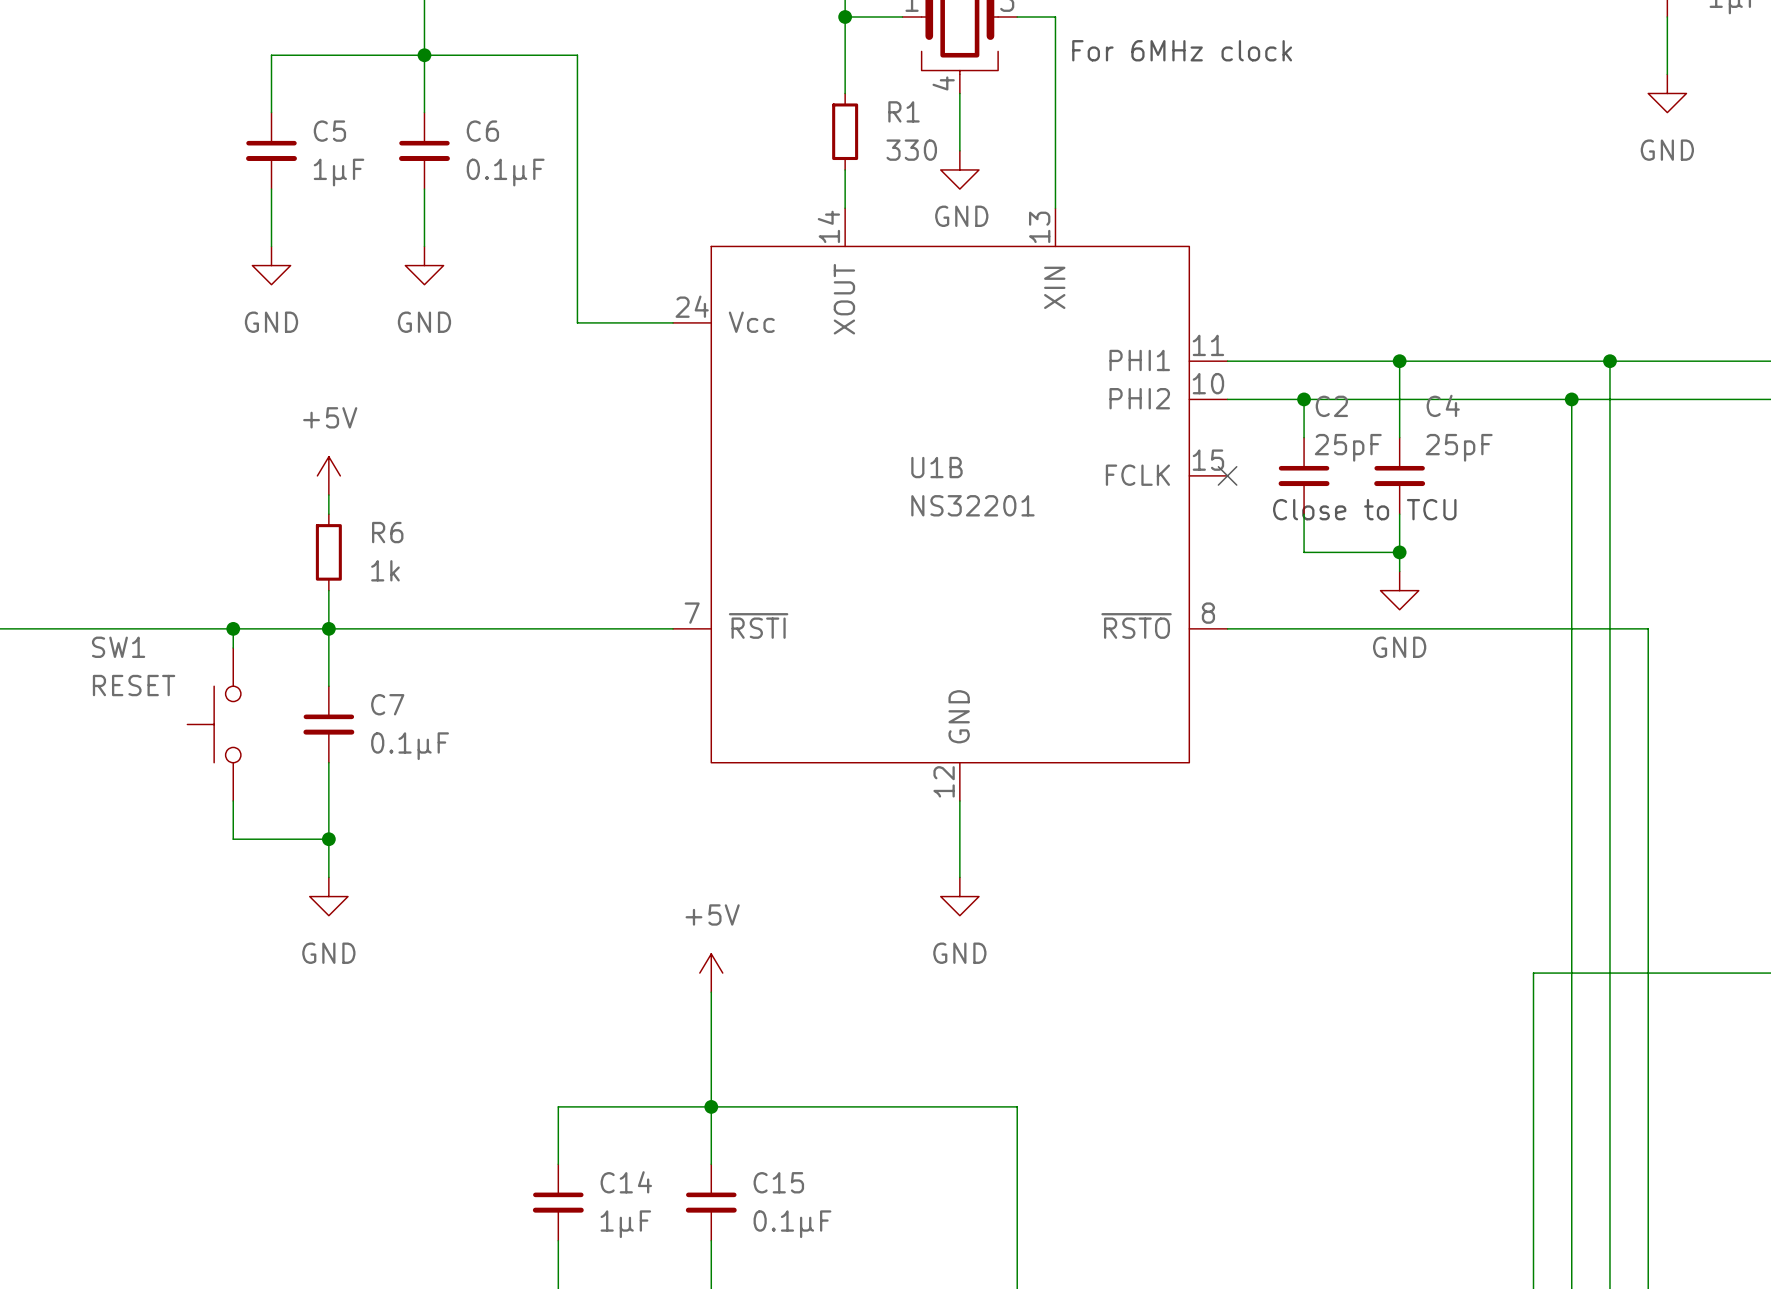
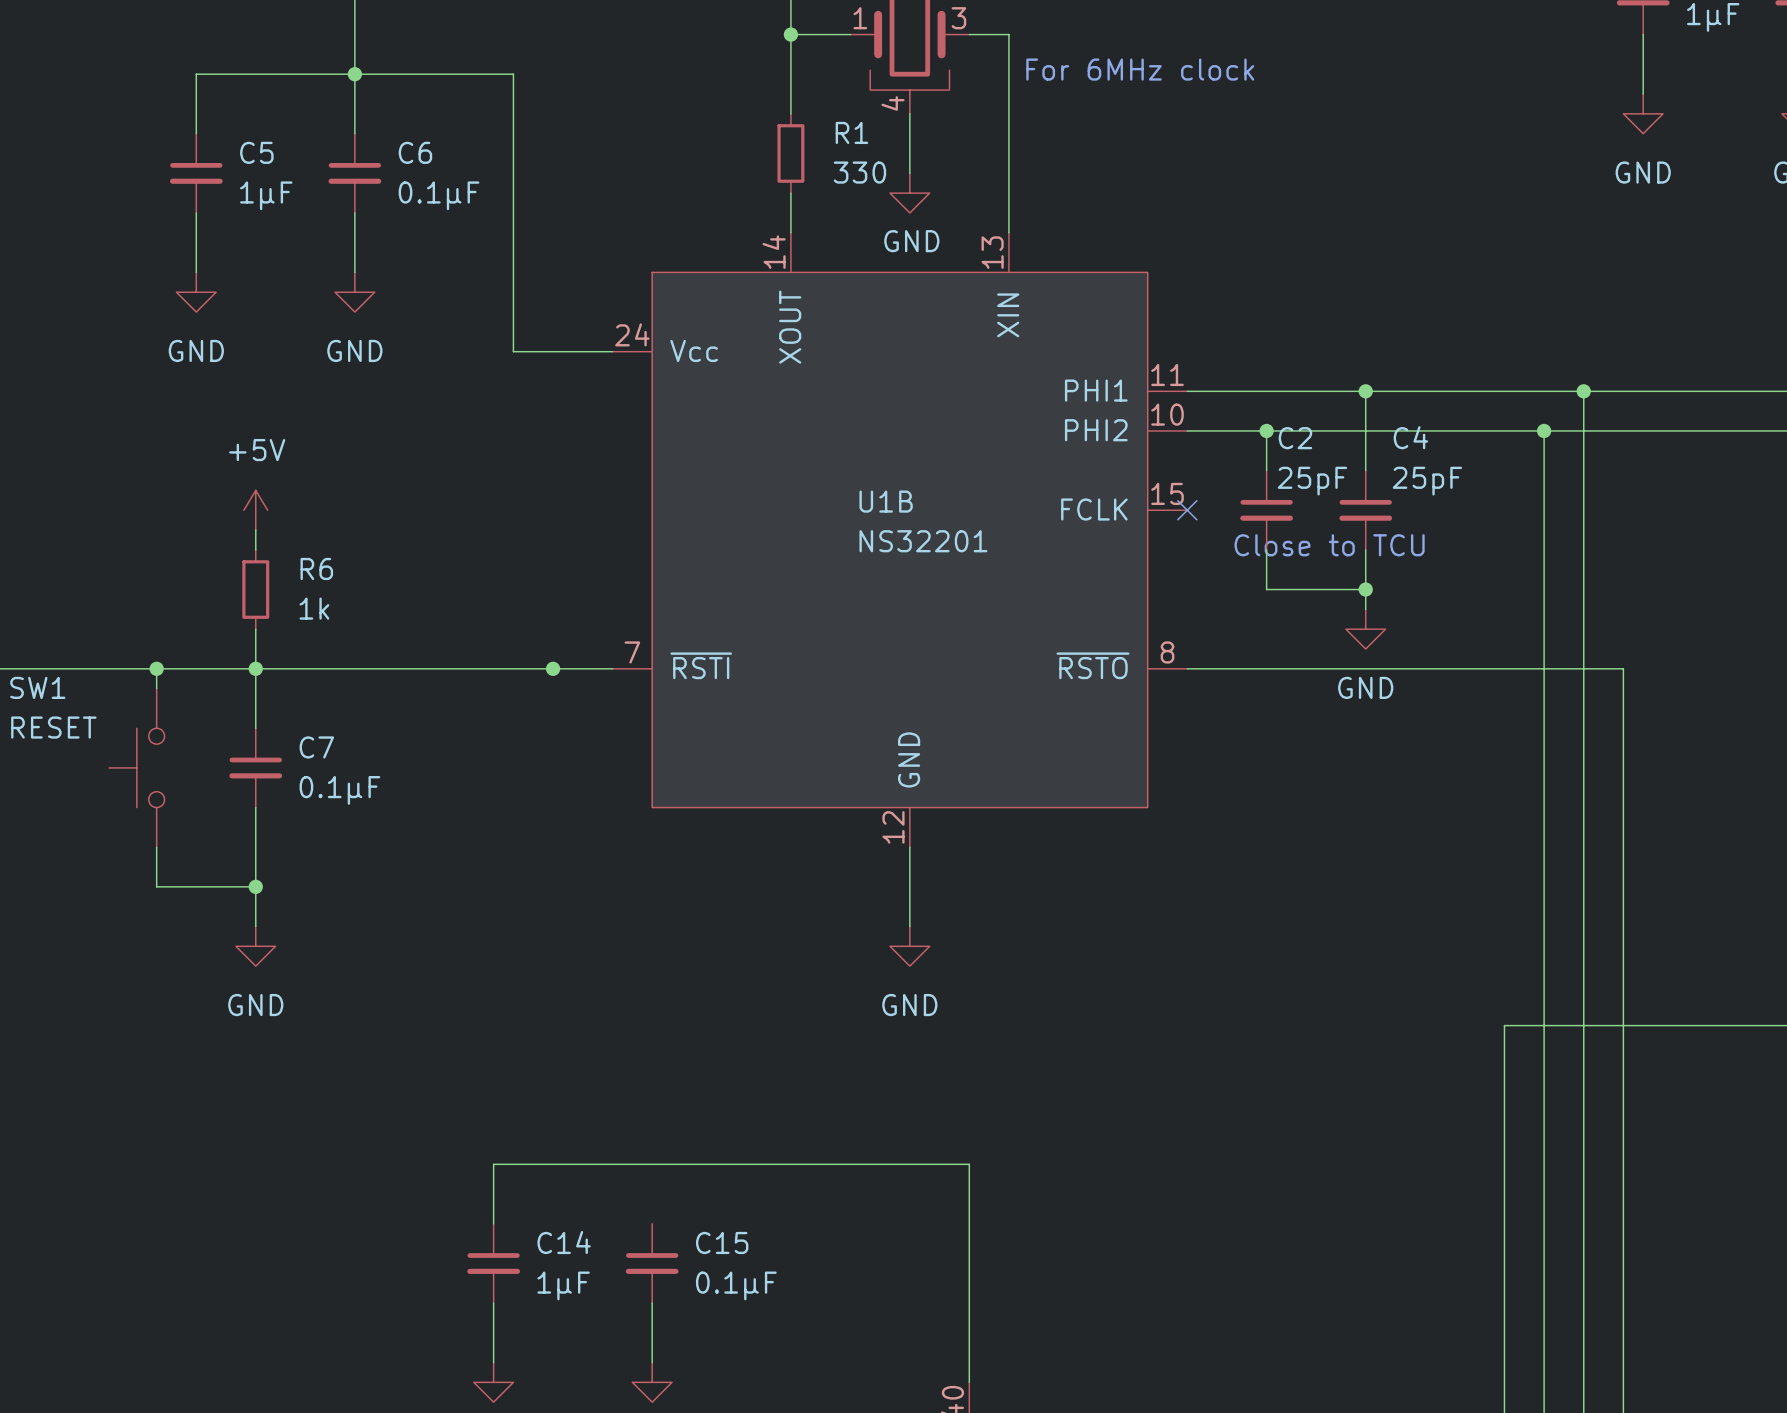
junction: none -> (553, 668)
power symbol: +5V (711, 973) -> none
wire: (711, 992) (711, 1164) -> none
junction: (711, 1106) -> none

